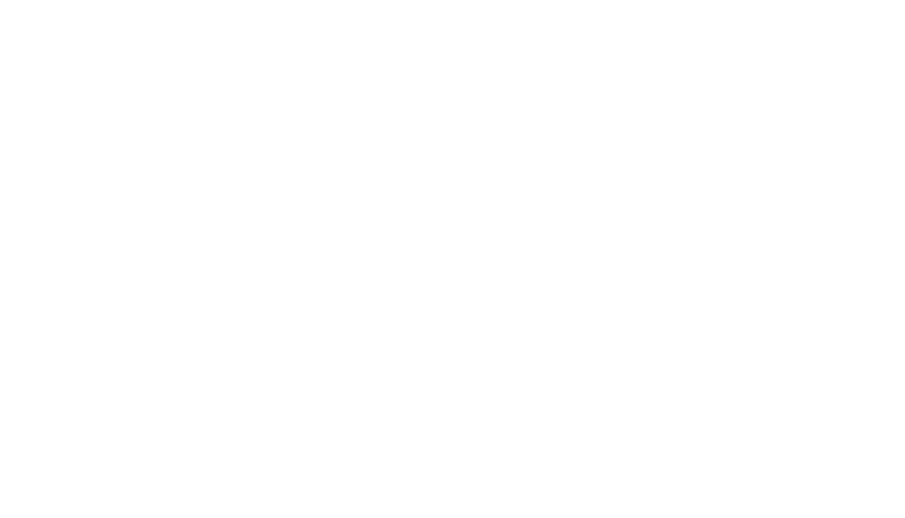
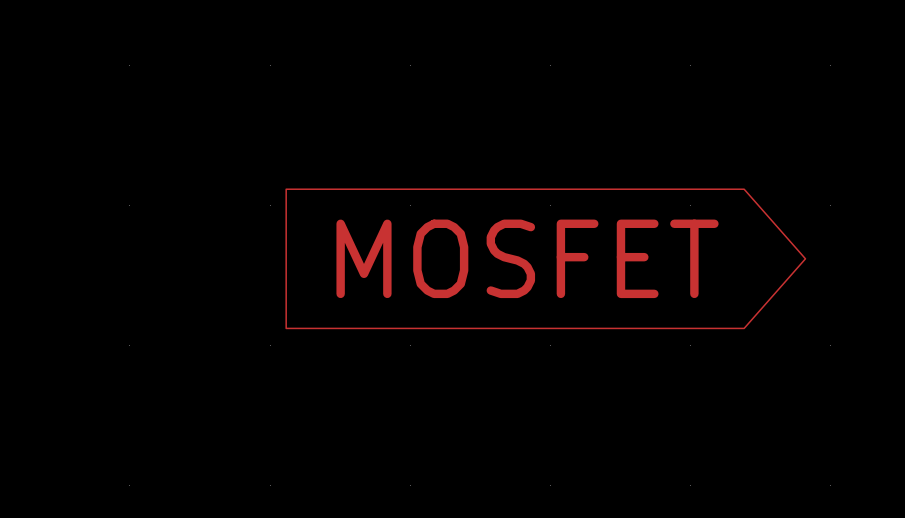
global label: none -> MOSFET (527, 258)

